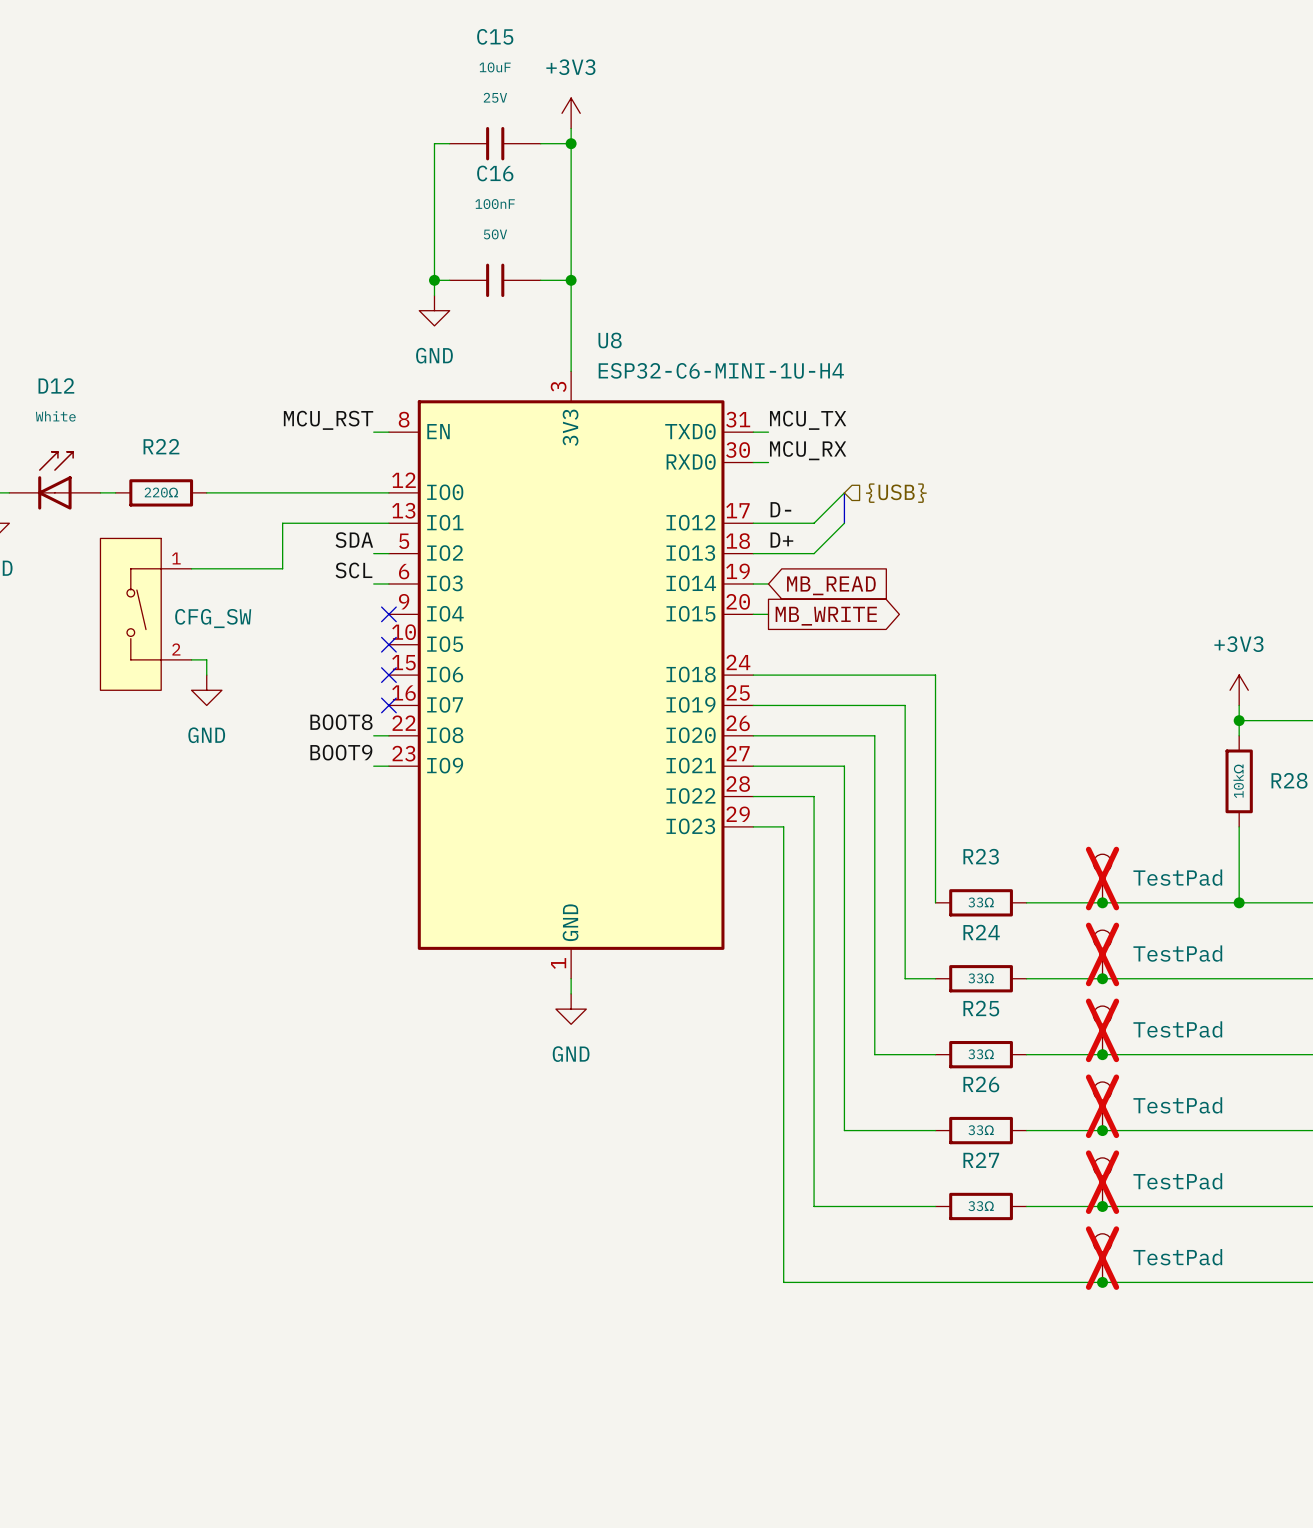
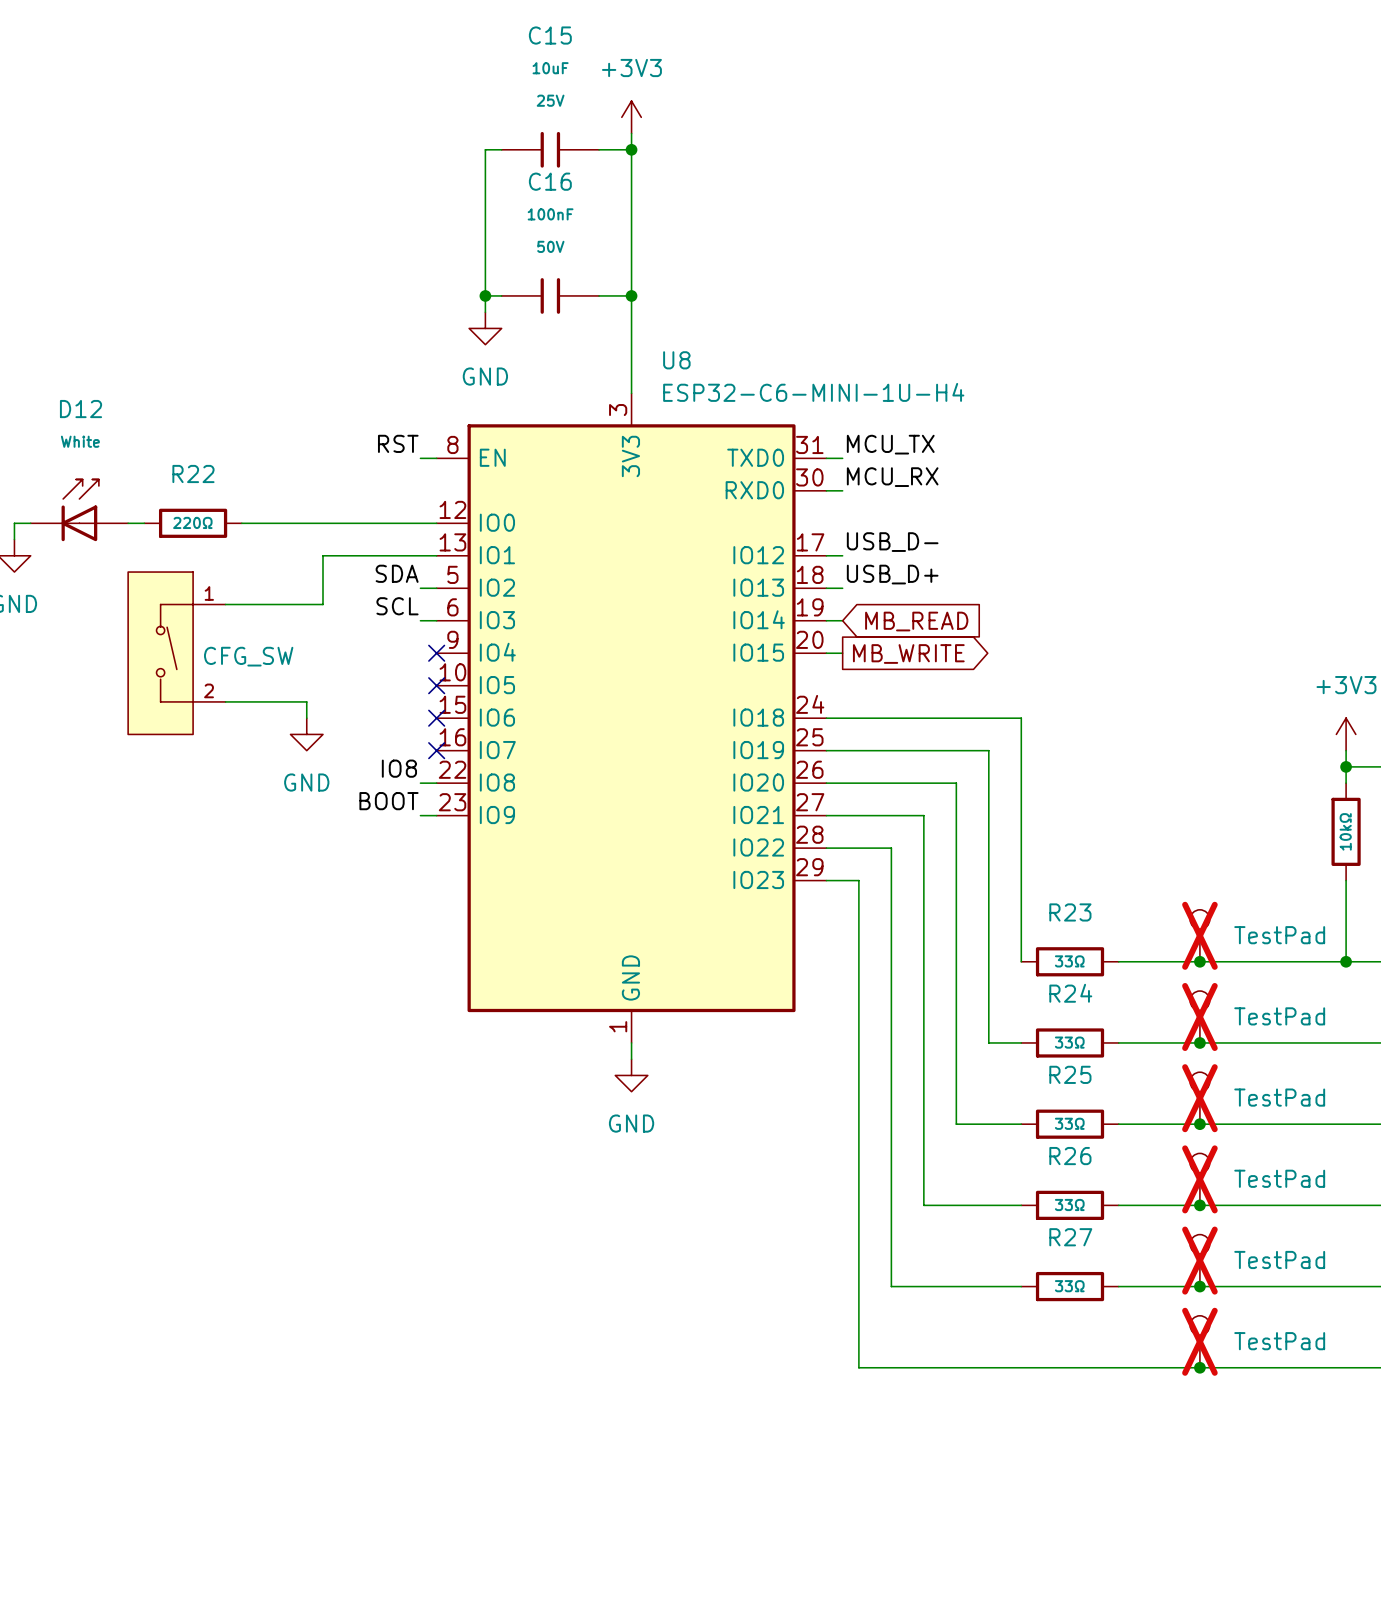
label: MCU_RST (328, 420) -> RST (398, 443)
wire: (844, 492) (814, 523) (768, 523) -> none
bus: (844, 492) (844, 523) -> none
hierarchical label: {USB} (896, 493) -> none
label: D- (780, 509) -> USB_D- (892, 542)
wire: (844, 523) (814, 553) (768, 553) -> none
label: D+ (781, 540) -> USB_D+ (892, 574)
wire: (206, 659) (206, 675) -> (241, 701) (306, 701) (306, 718)
power symbol position: GND (206, 690) -> GND (306, 734)
label: BOOT8 (341, 722) -> IO8 (399, 768)
label: BOOT9 (341, 752) -> BOOT (388, 801)

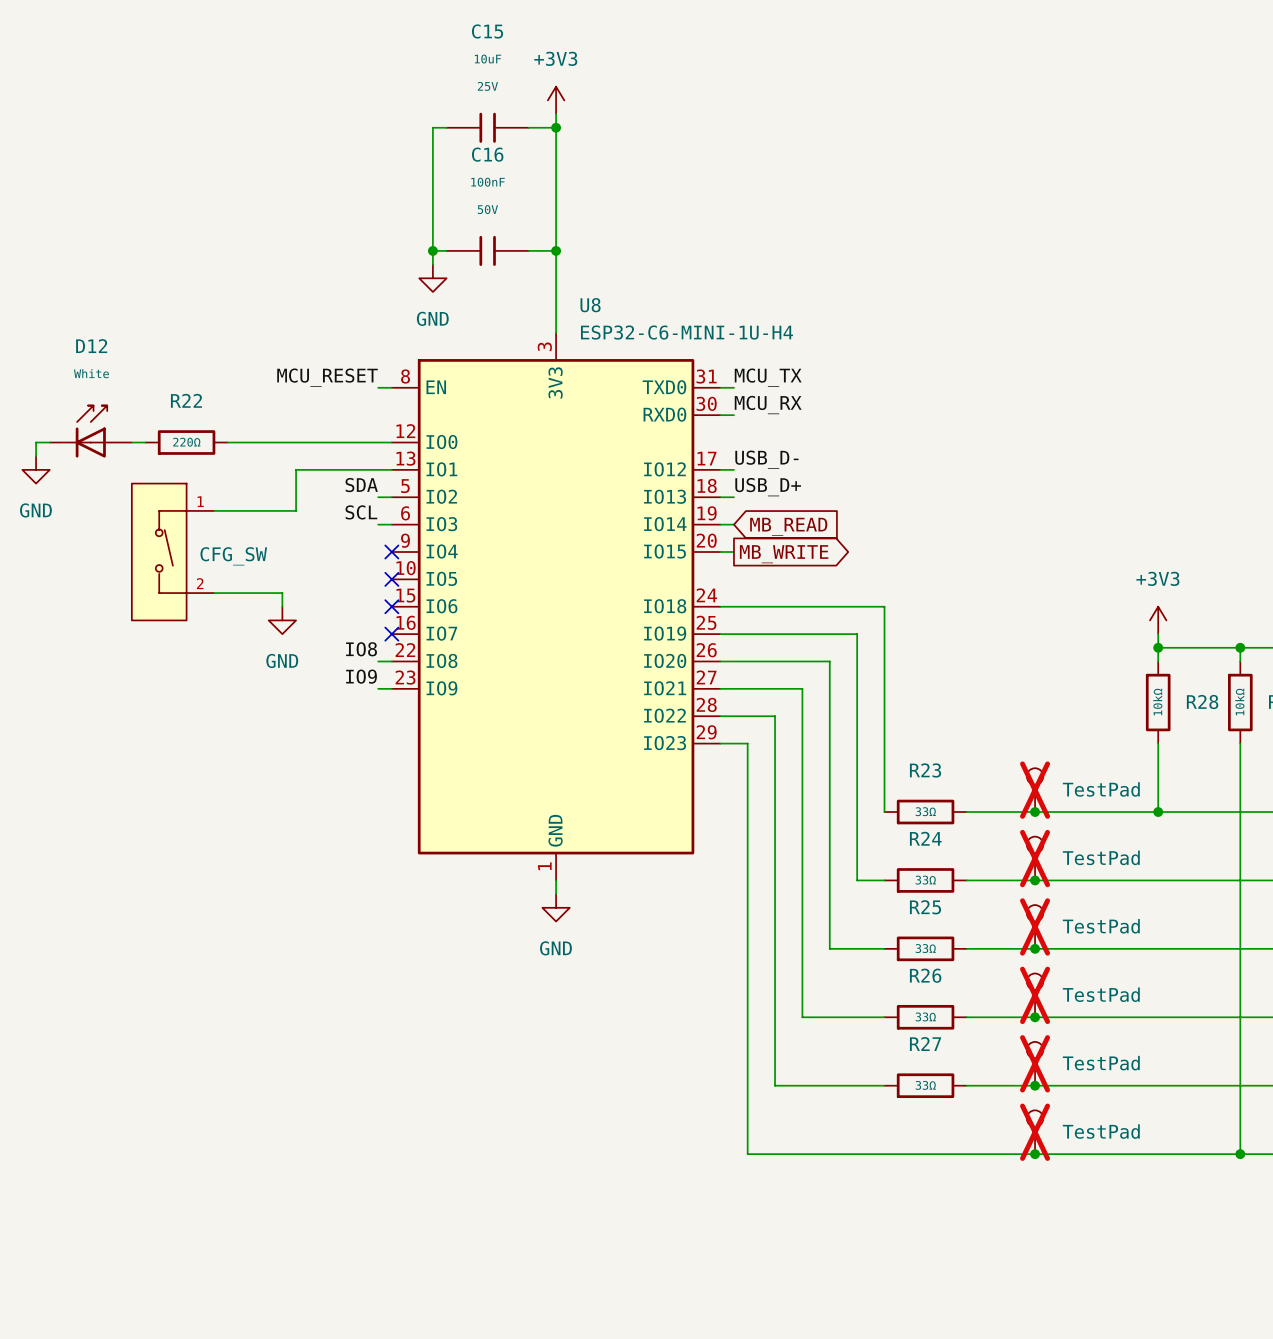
label: RST (398, 443) -> MCU_RESET (327, 377)
label: BOOT (388, 801) -> IO9 (361, 676)

